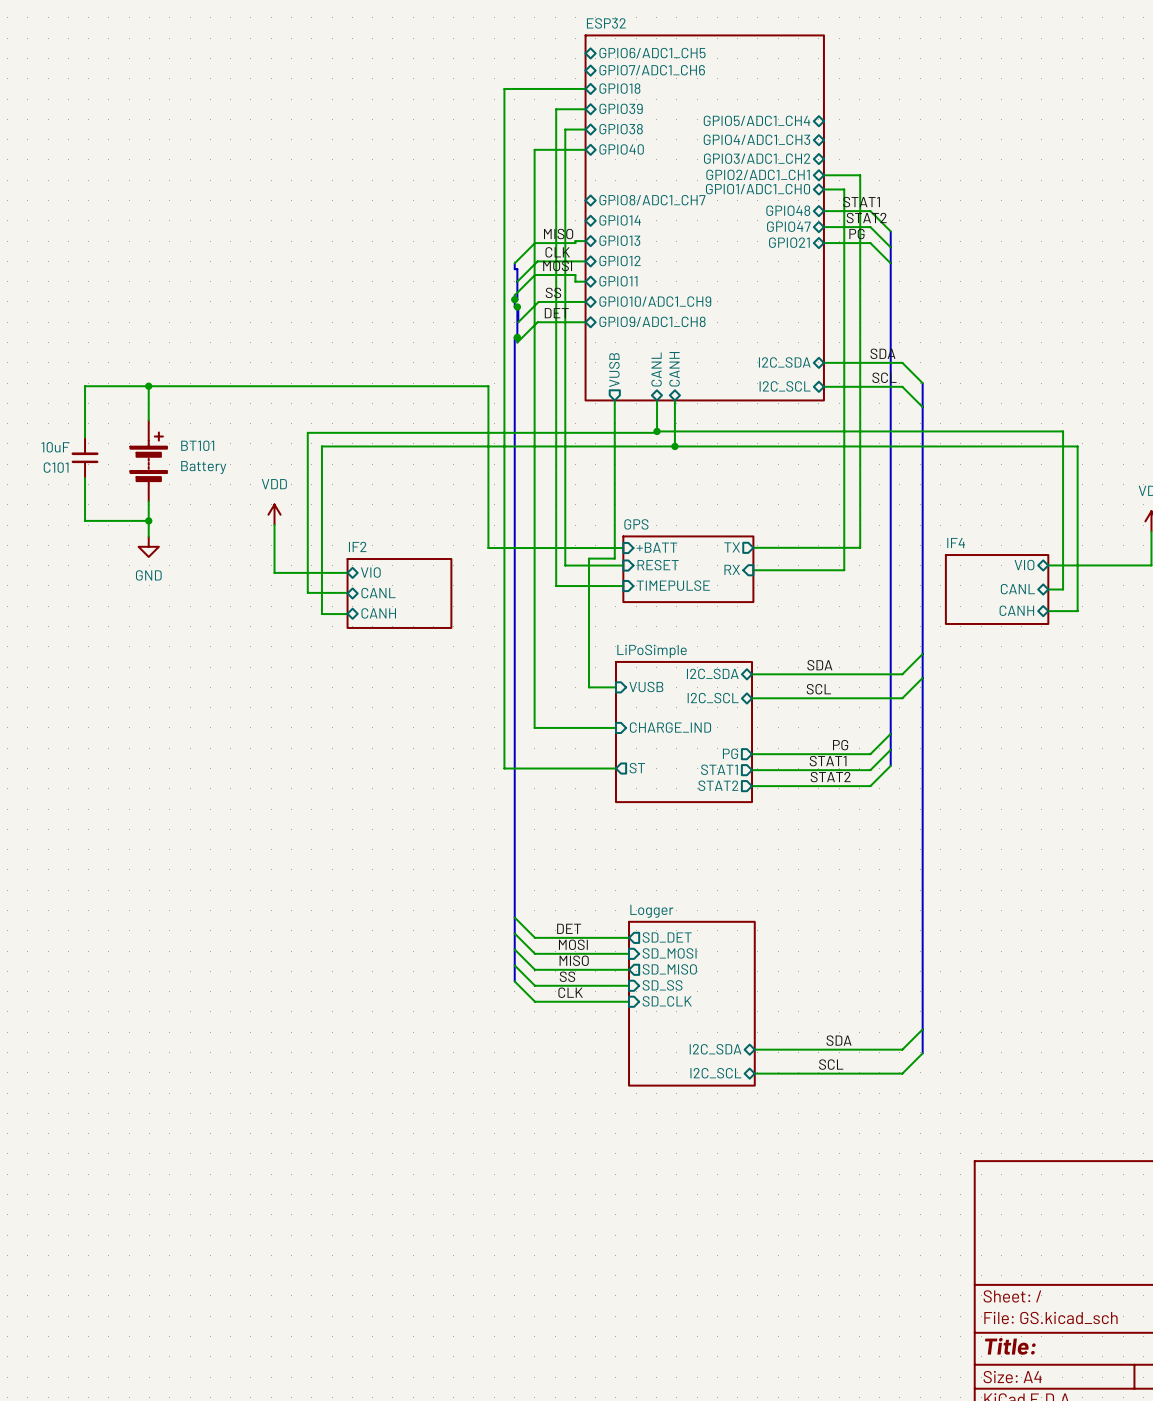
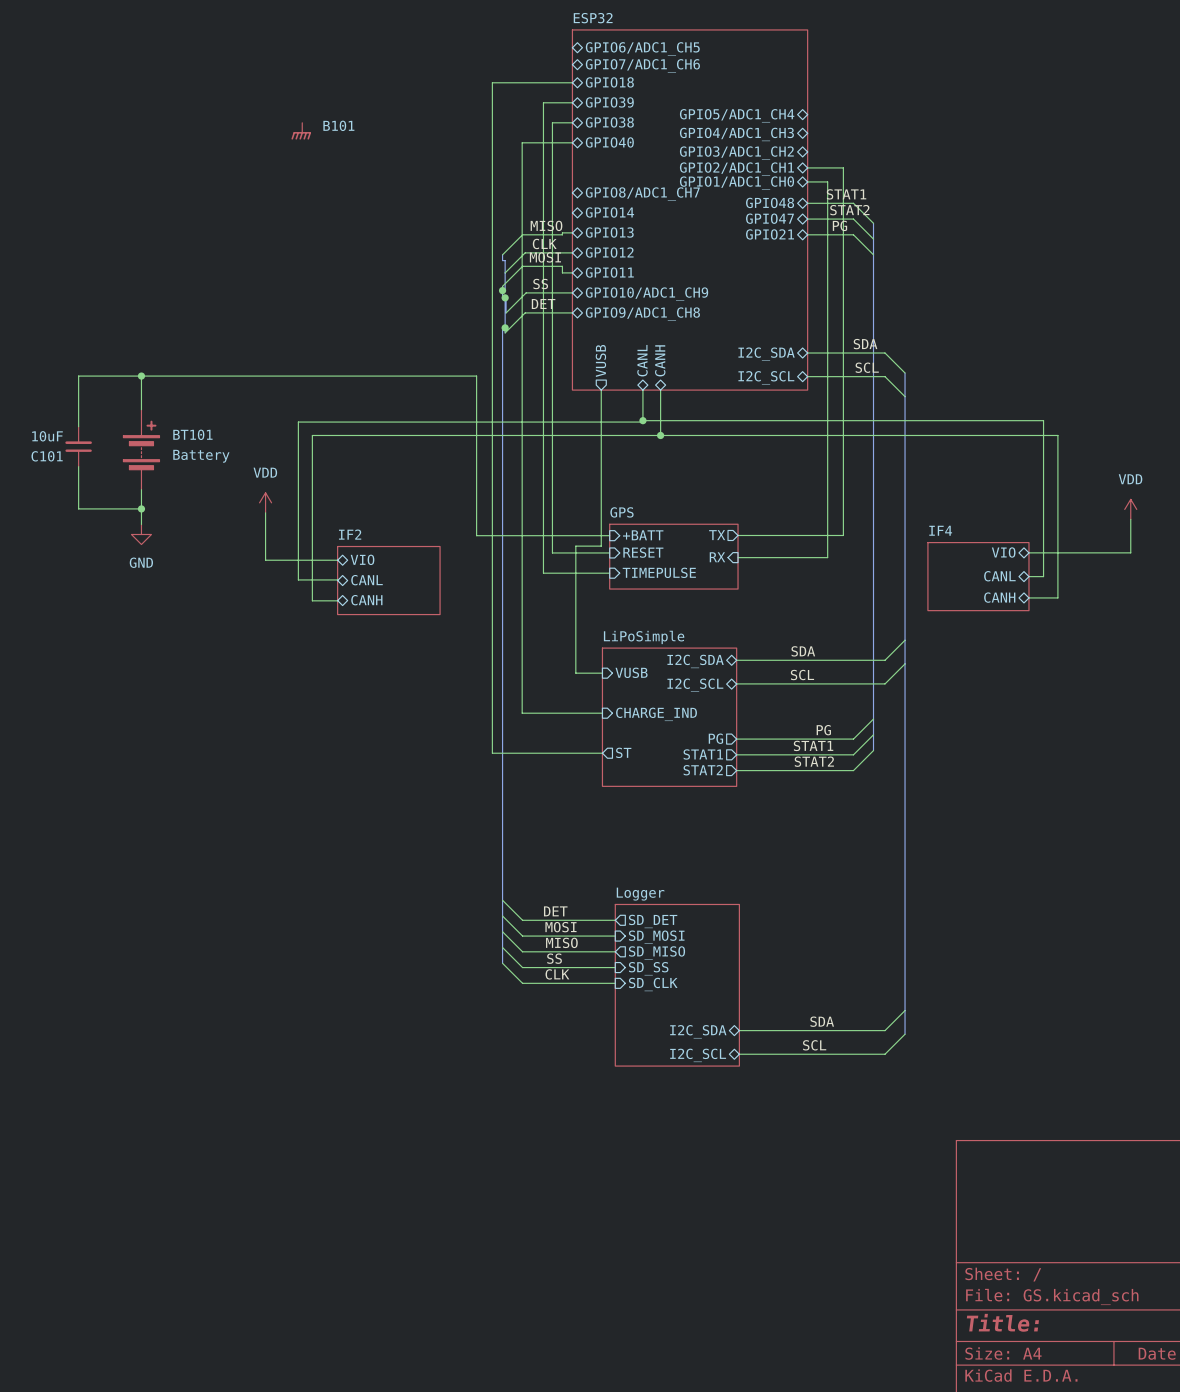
B101: none -> (301, 131)

